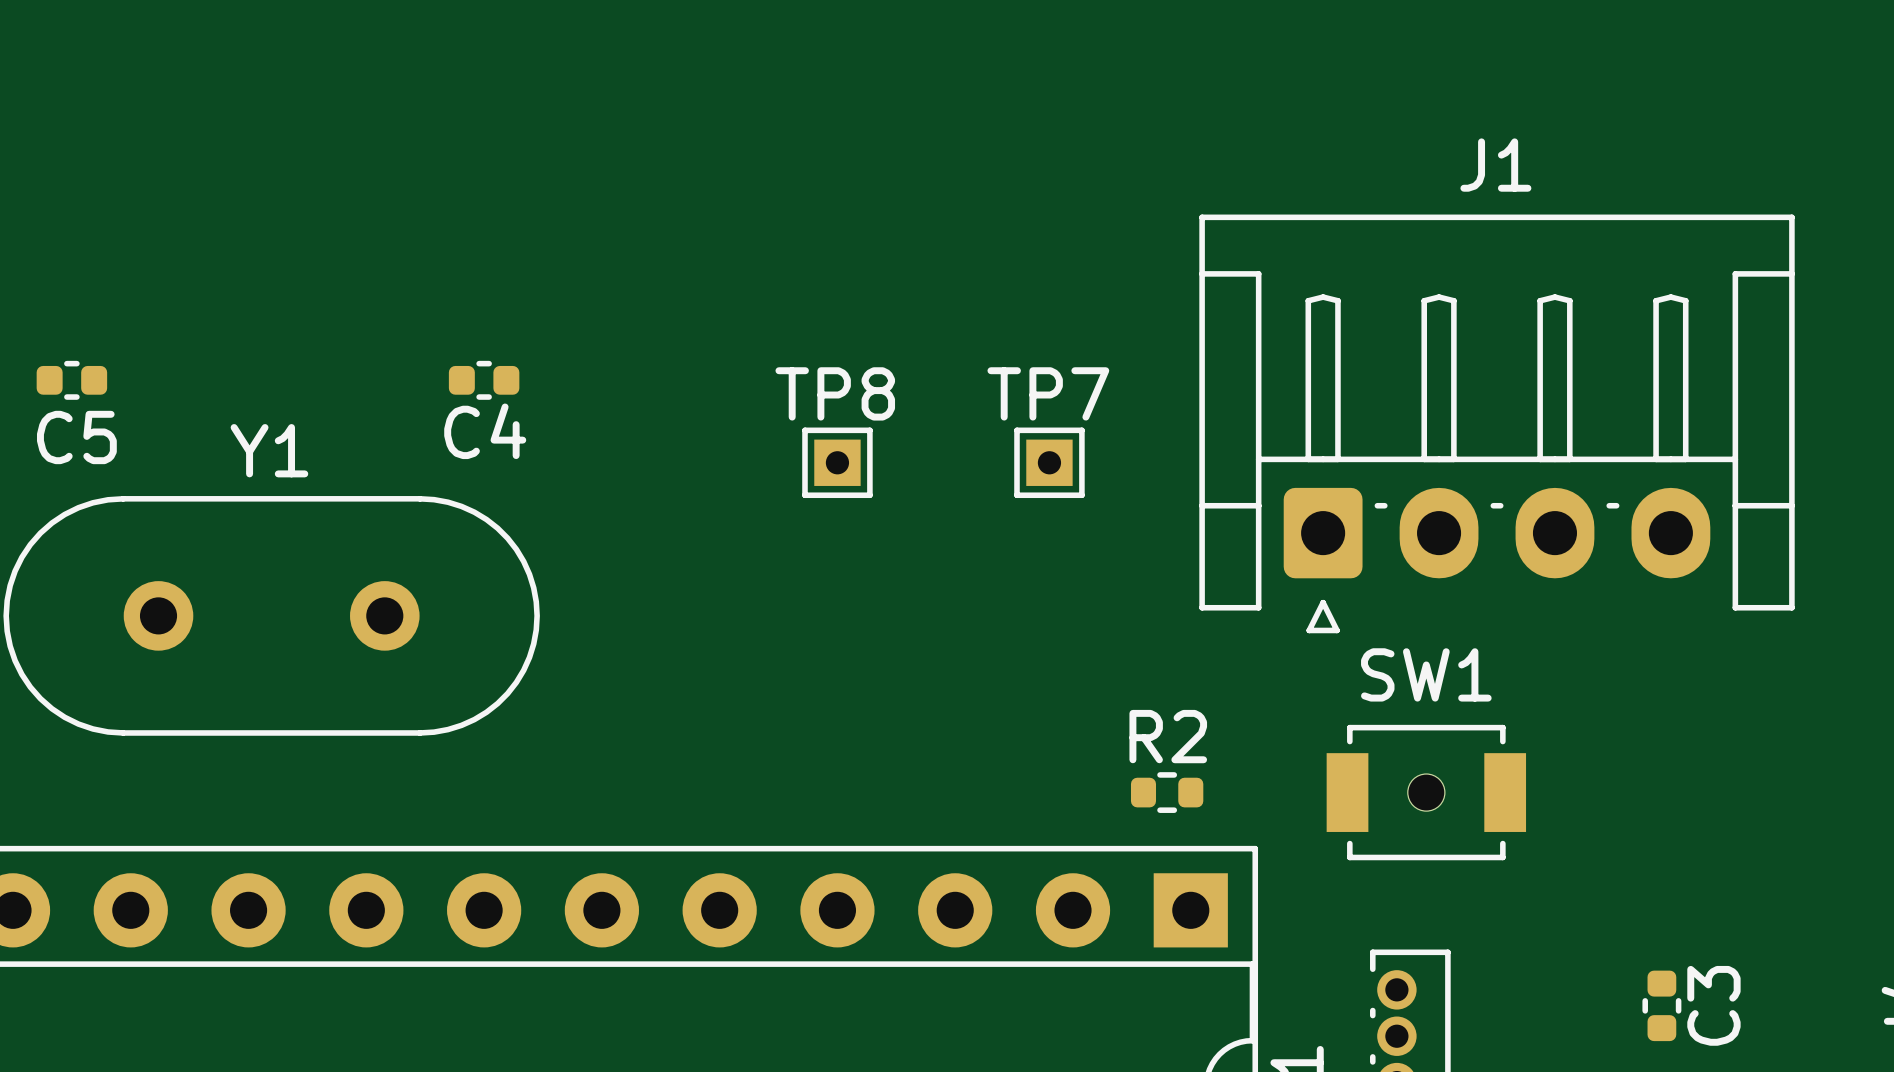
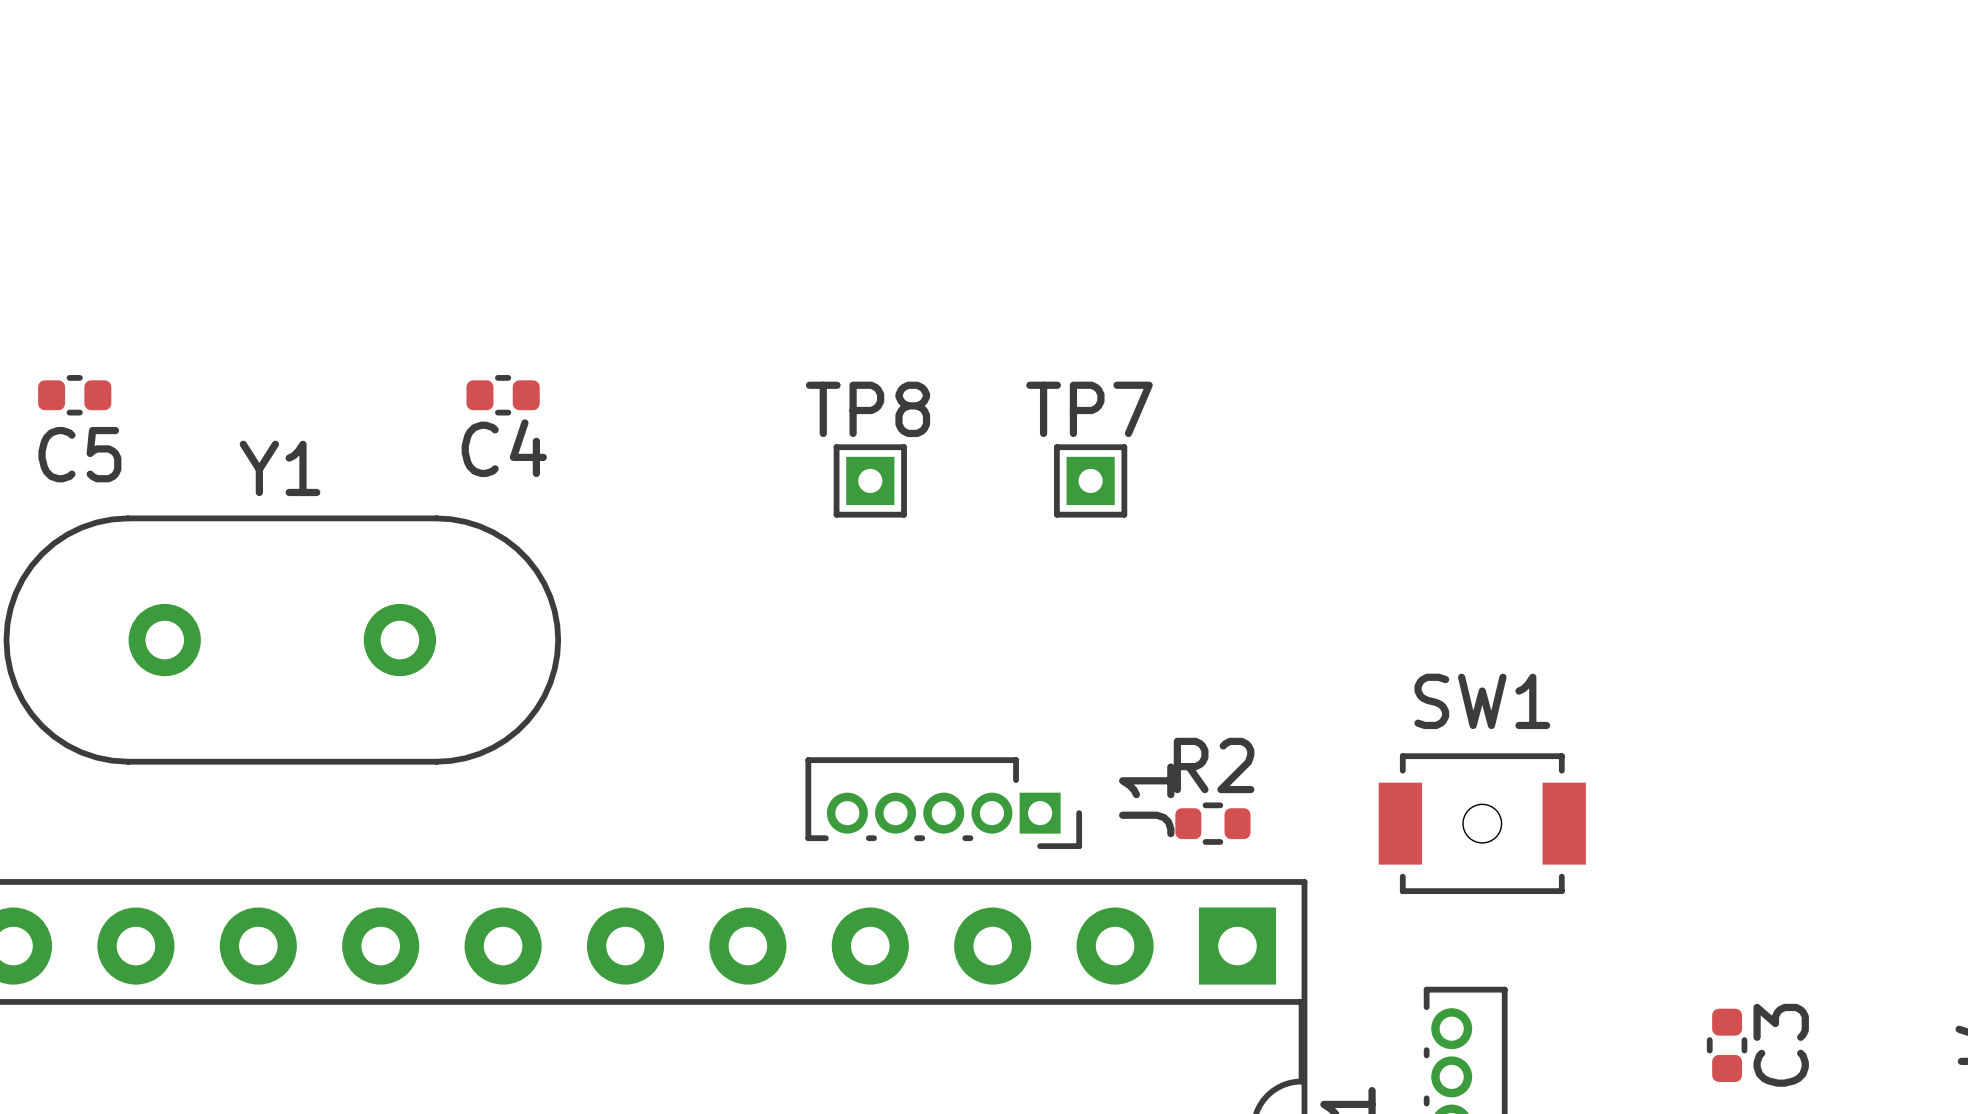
J1 name position: J1 (1495, 165) -> J1 (1146, 800)
J1 footprint: [1199, 214, 1795, 634] -> [805, 757, 1083, 850]

